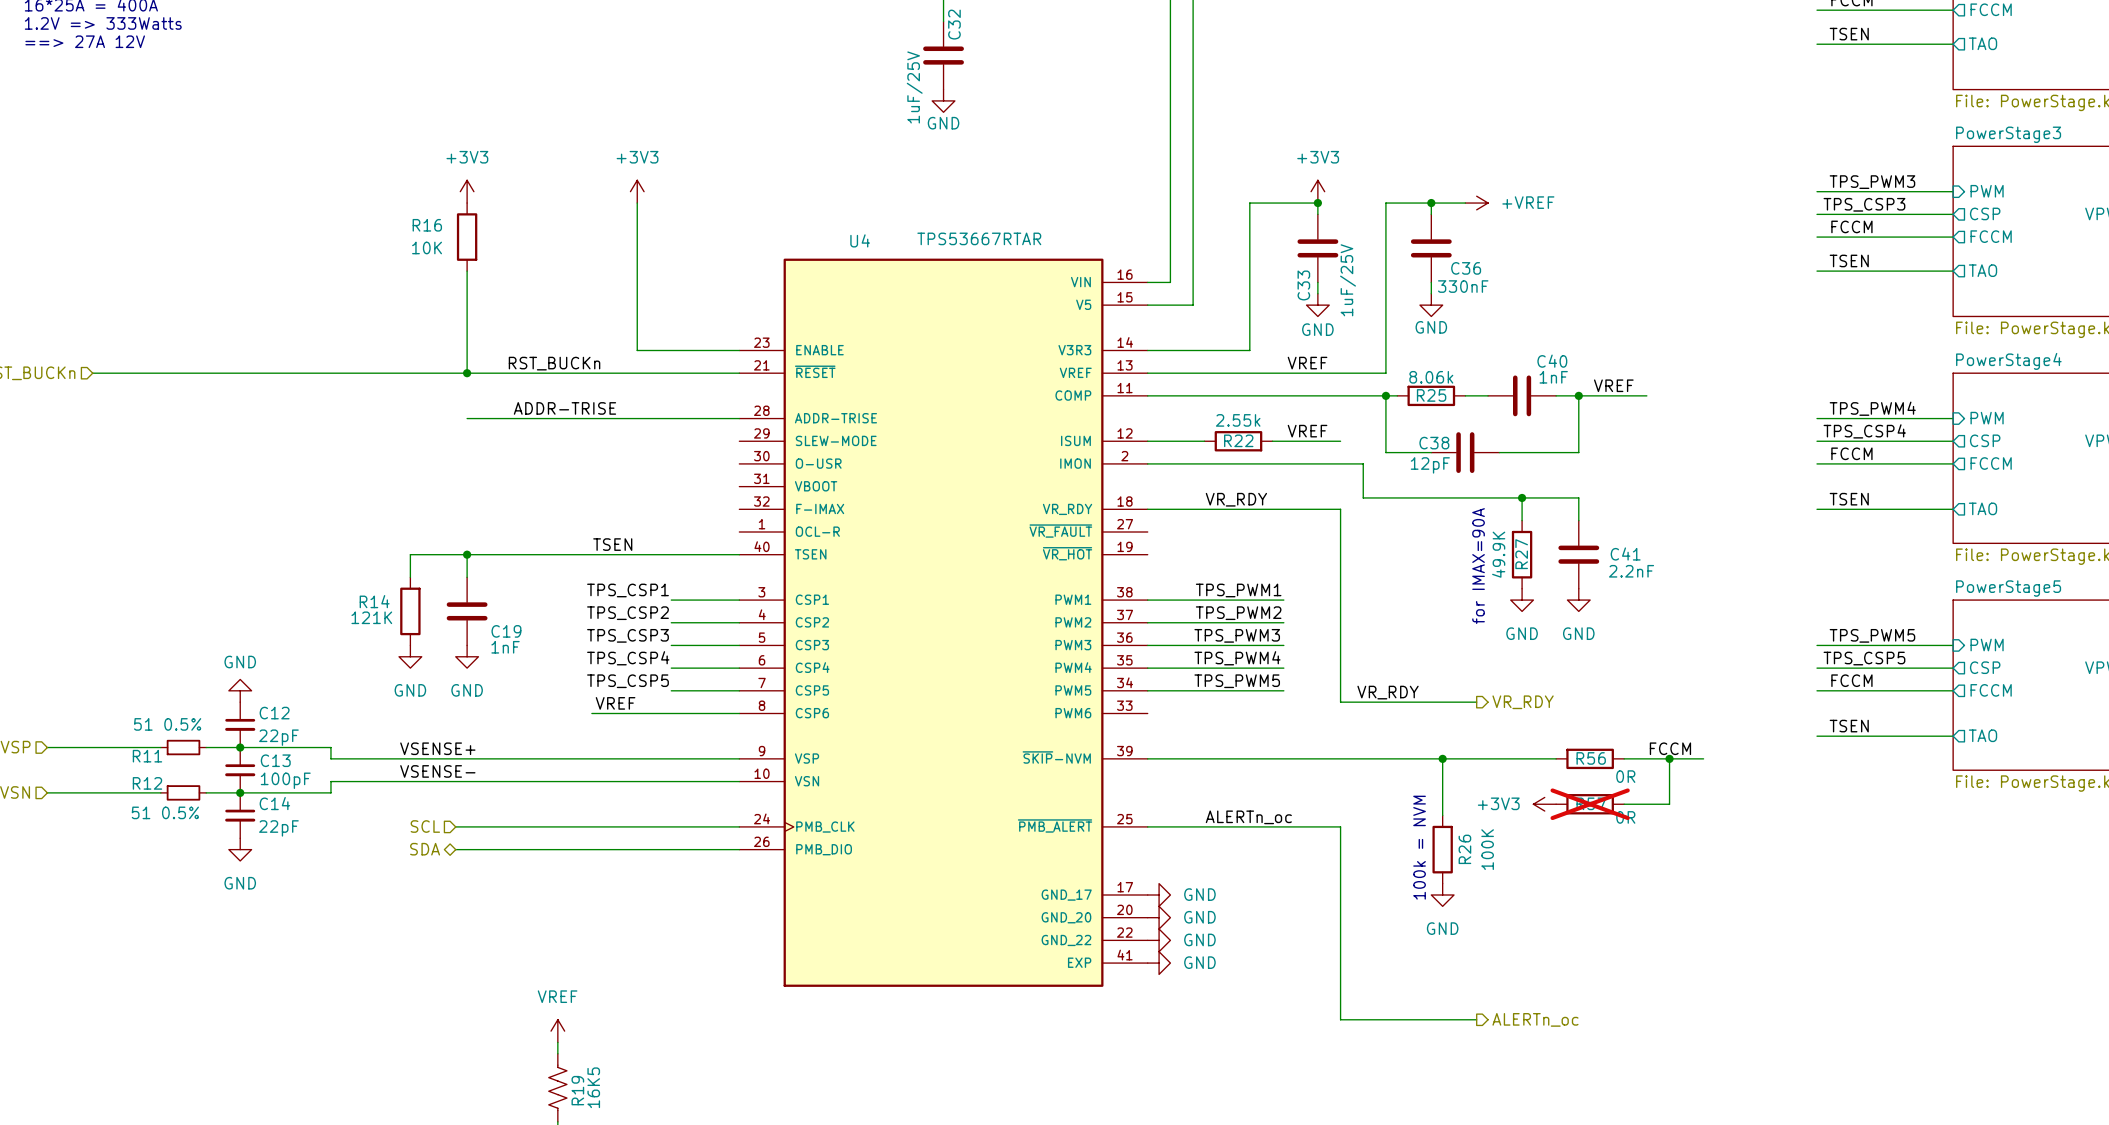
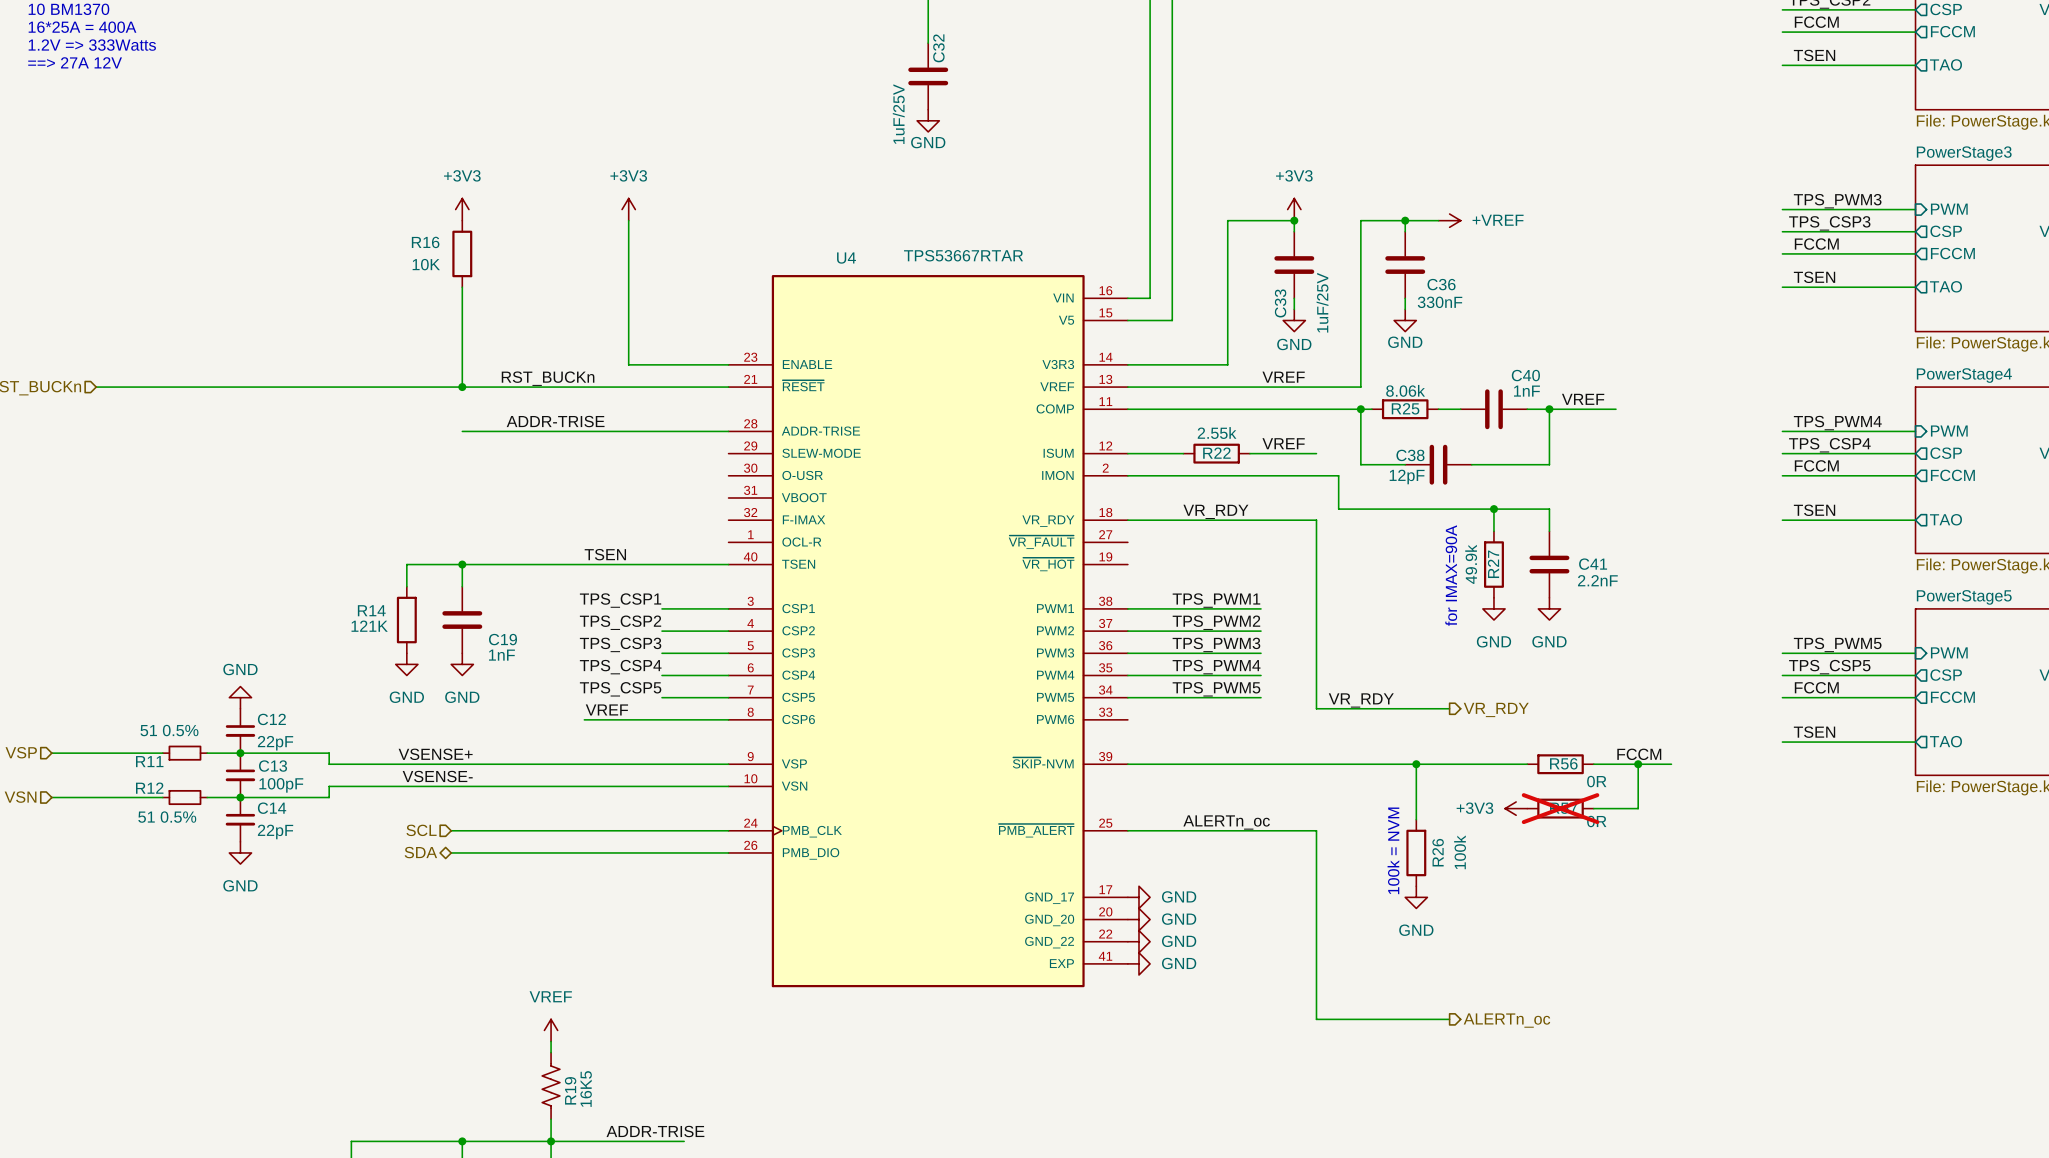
R27 value: 49.9K (1498, 554) -> 49.9k (1471, 564)
R26 value: 100K (1487, 849) -> 100k (1460, 852)

